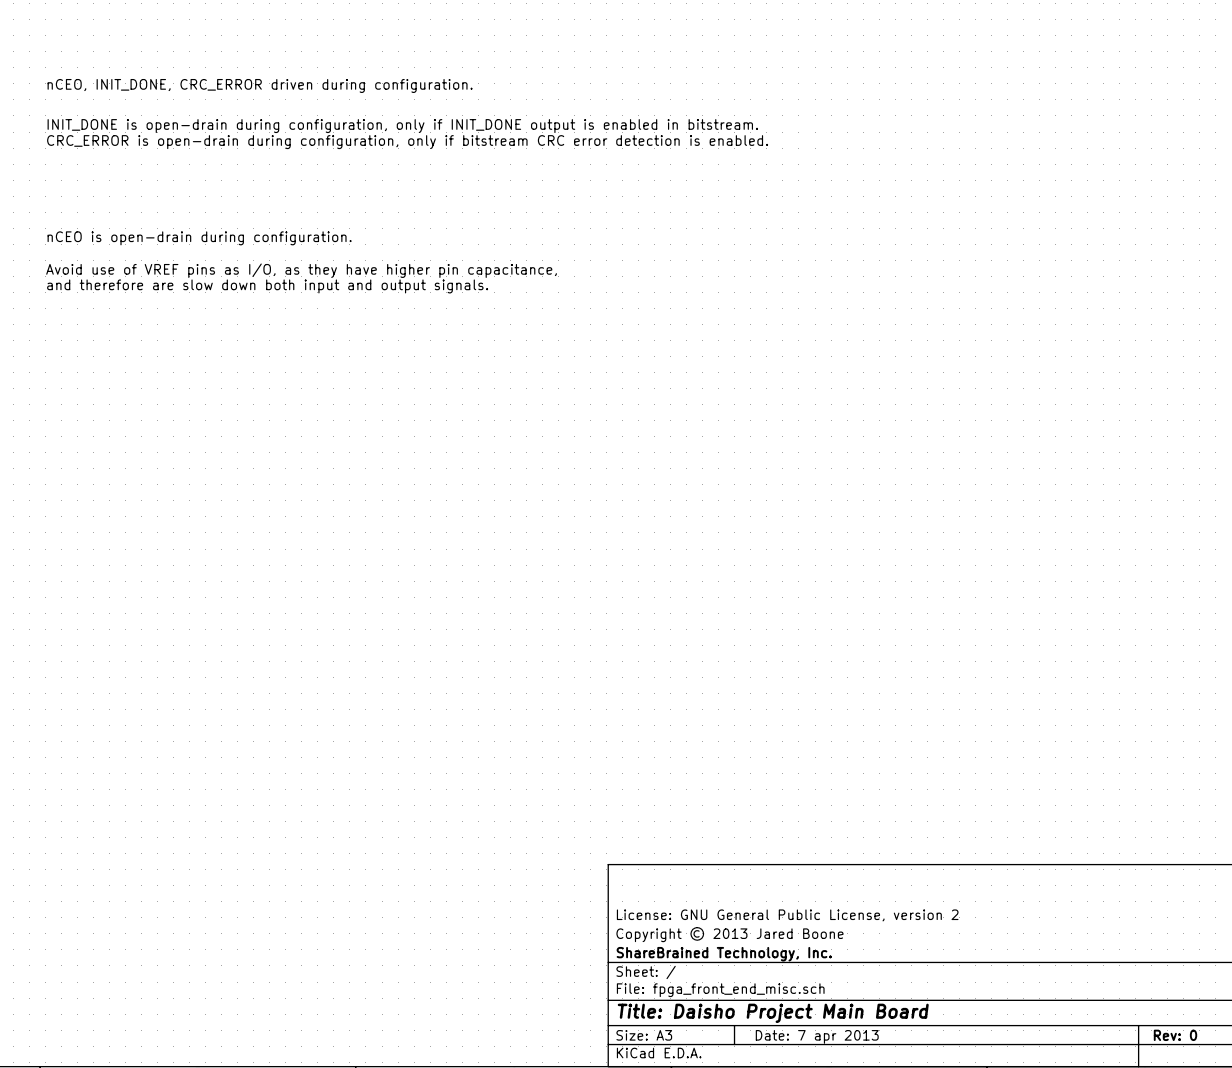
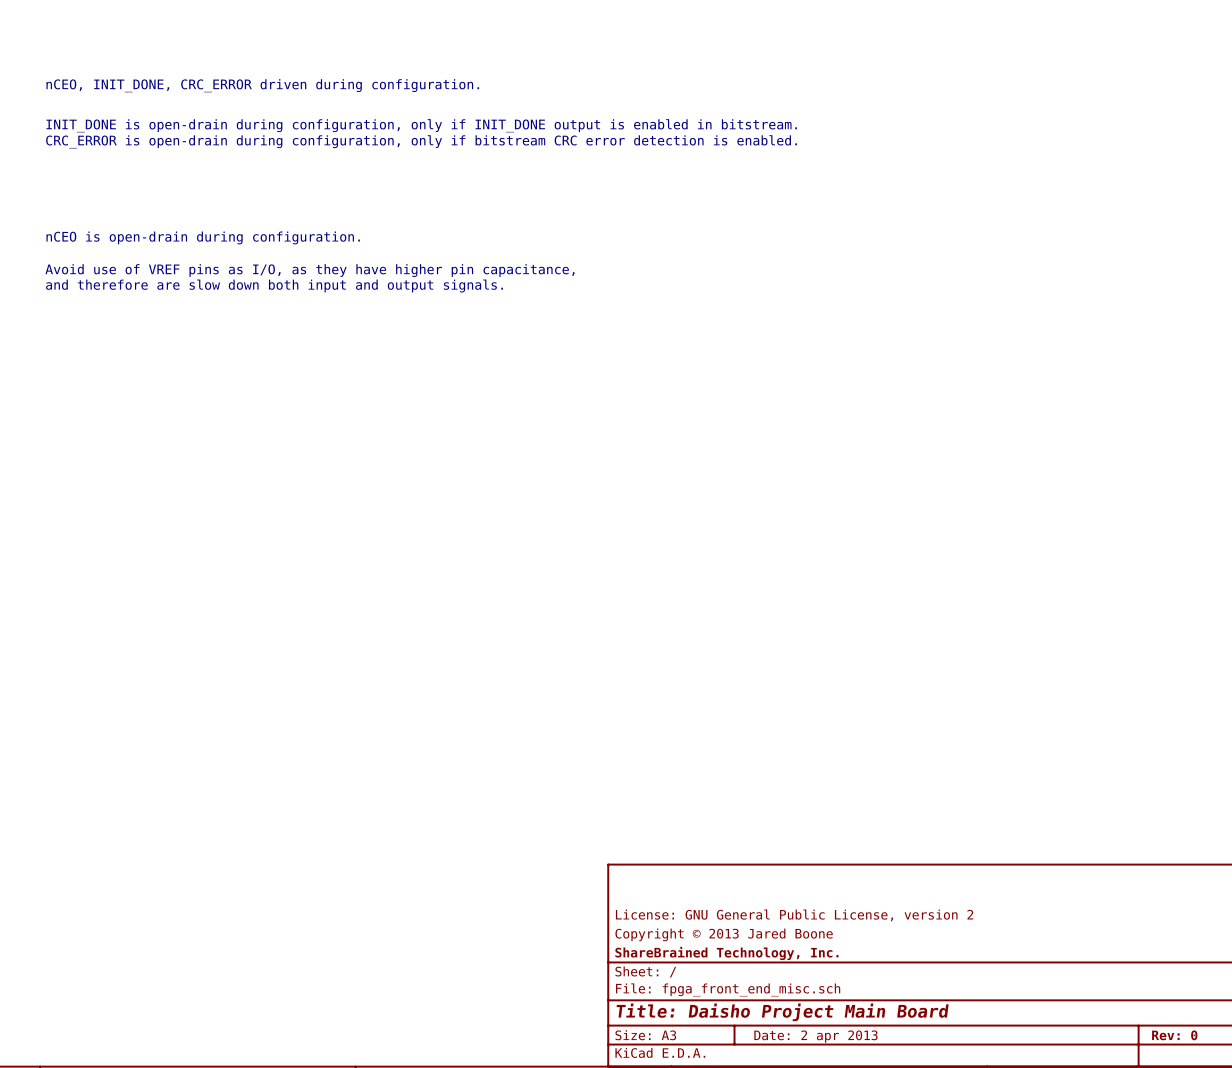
title block: Date: 7 apr 2013 (817, 1036) -> Date: 2 apr 2013 (815, 1036)

